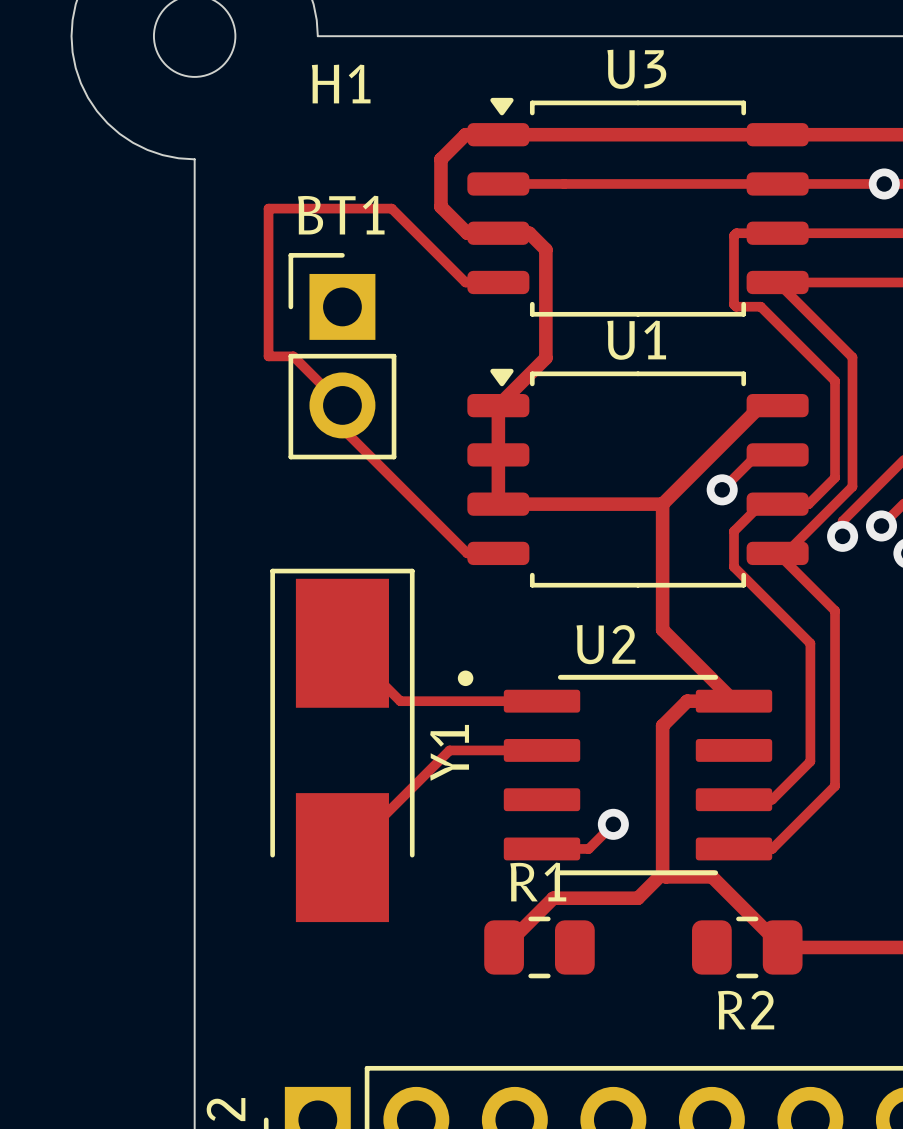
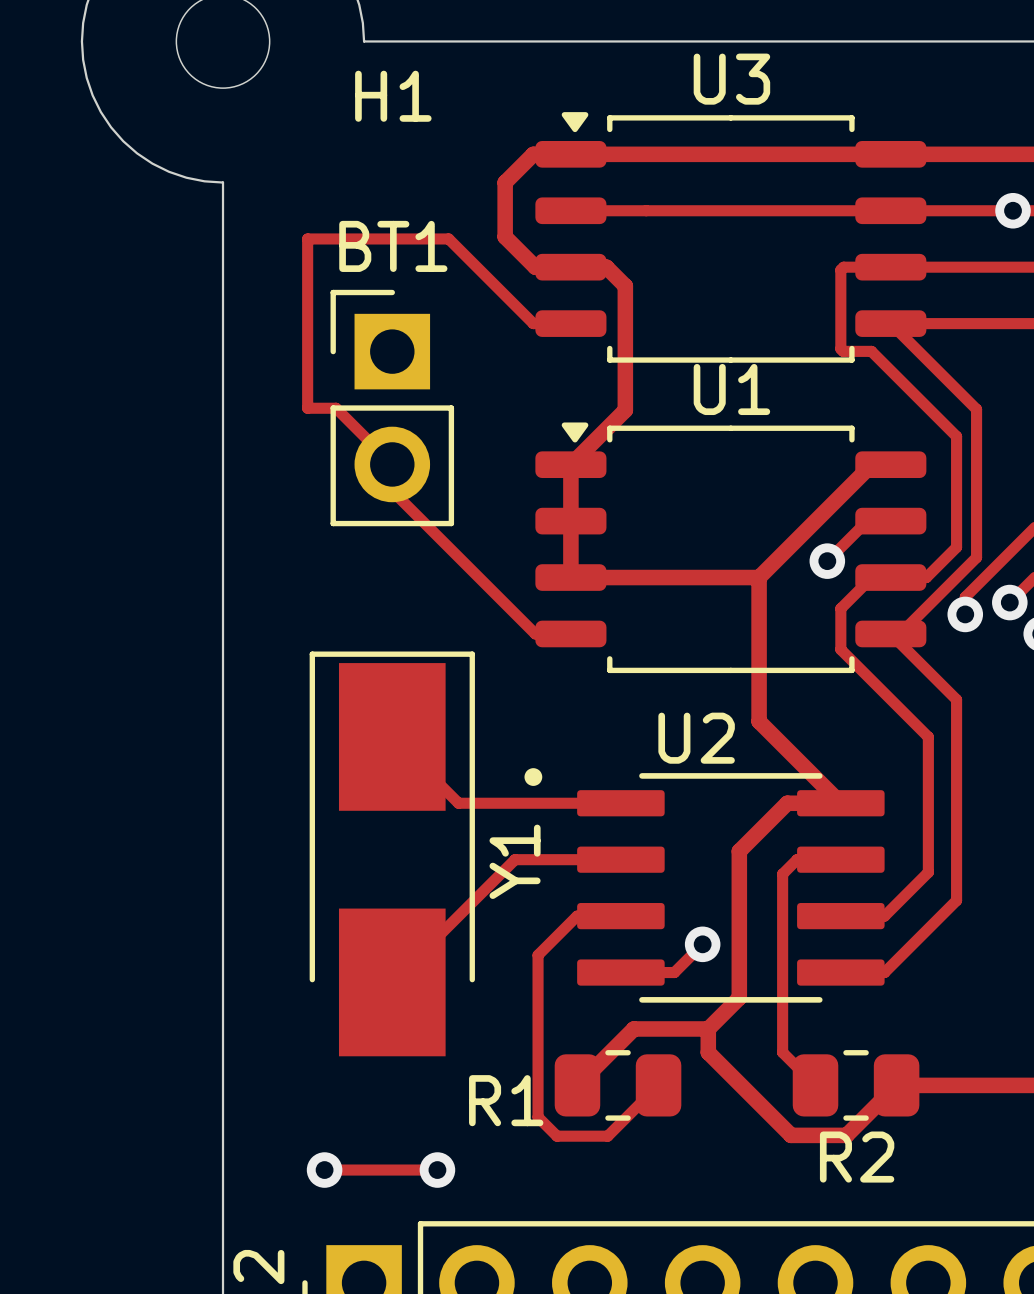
track: (662, 725) (662, 873) -> (759, 831) (739, 851) (739, 997) (708, 1028) (708, 1052) (791, 1135) (846, 1135) (896, 1085)
track: none -> (840, 859) (797, 859) (782, 874) (782, 1052) (815, 1085)
track: none -> (620, 916) (577, 916) (538, 955) (538, 1117) (557, 1136) (607, 1136) (658, 1085)
track: (662, 873) (665, 876) (712, 876) (782, 947) -> none
track: (662, 873) (637, 898) (618, 898) -> none
R1 name position: R1 (538, 882) -> R1 (506, 1100)
track: none -> (324, 1170) (437, 1170)
via: none -> (324, 1170)
via: none -> (437, 1170)

